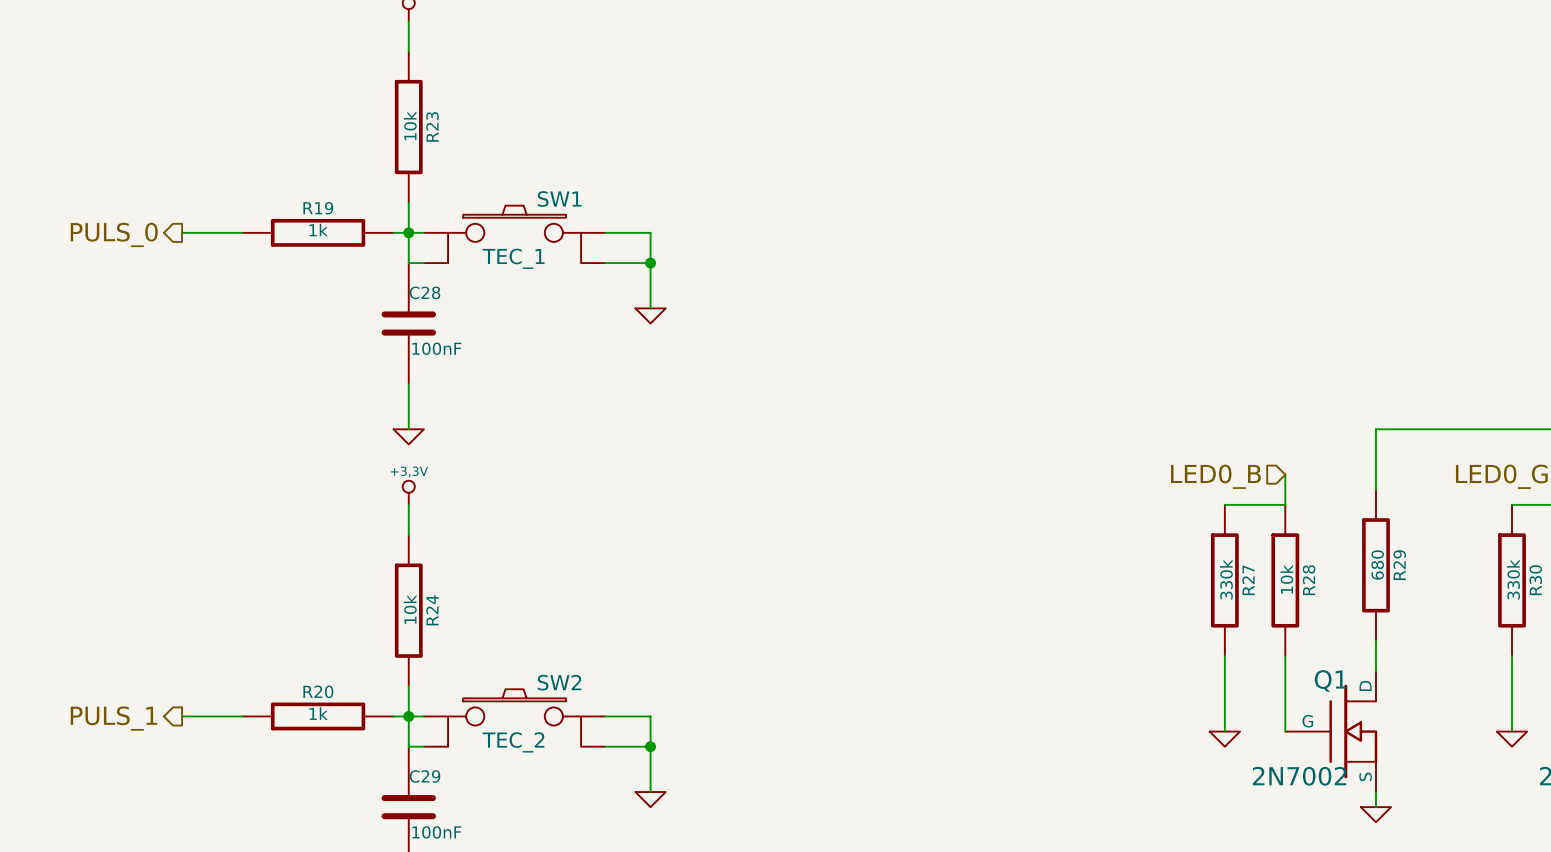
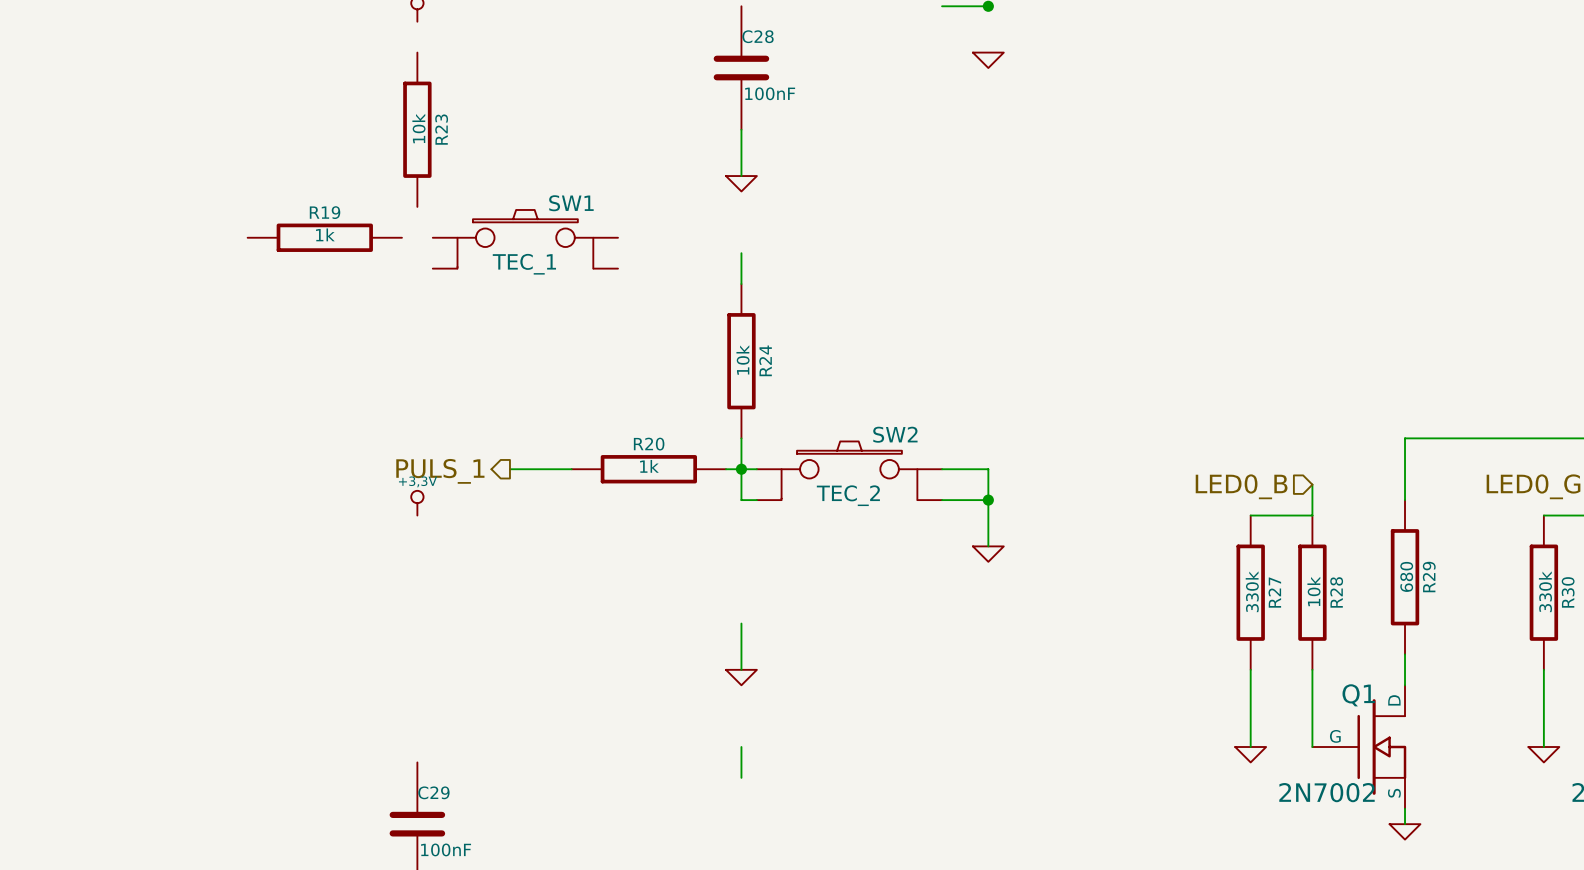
wire: none -> (942, 6) (988, 6)
junction: none -> (988, 6)
wire: (408, 21) (408, 51) -> none
power symbol: none -> (988, 60)
wire: none -> (741, 129) (741, 176)
wire: (408, 202) (408, 263) (423, 263) -> none
wire: (182, 232) (242, 232) -> none
wire: (393, 232) (423, 232) -> none
junction: (408, 232) -> none
wire: (605, 232) (650, 232) (650, 308) -> none
hierarchical label: PULS_0 (114, 234) -> none
wire: none -> (741, 253) (741, 284)
wire: (605, 263) (650, 263) -> none
junction: (650, 263) -> none
power symbol position: (650, 315) -> (741, 183)
C28 position: (408, 323) -> (741, 68)
wire: (408, 383) (408, 429) -> none
wire: none -> (741, 438) (741, 500) (756, 500)
power symbol: (408, 436) -> none
wire: none -> (509, 469) (571, 469)
wire: none -> (726, 469) (756, 469)
junction: none -> (741, 469)
wire: none -> (942, 469) (988, 469) (988, 546)
hierarchical label: none -> PULS_1 (440, 471)
wire: none -> (942, 500) (988, 500)
junction: none -> (988, 500)
wire: (408, 504) (408, 535) -> none
power symbol: none -> (988, 554)
R24 position: (408, 610) -> (741, 361)
wire: none -> (741, 623) (741, 669)
wire: (408, 686) (408, 746) (423, 746) -> none
wire: (182, 716) (242, 716) -> none
R20 position: (318, 716) -> (648, 469)
wire: (393, 716) (423, 716) -> none
junction: (408, 716) -> none
wire: (605, 716) (650, 716) (650, 792) -> none
SW2 position: (514, 717) -> (849, 470)
hierarchical label: PULS_1 (113, 718) -> none
wire: none -> (741, 747) (741, 777)
wire: (605, 746) (650, 746) -> none
junction: (650, 746) -> none
power symbol position: (650, 799) -> (741, 677)

